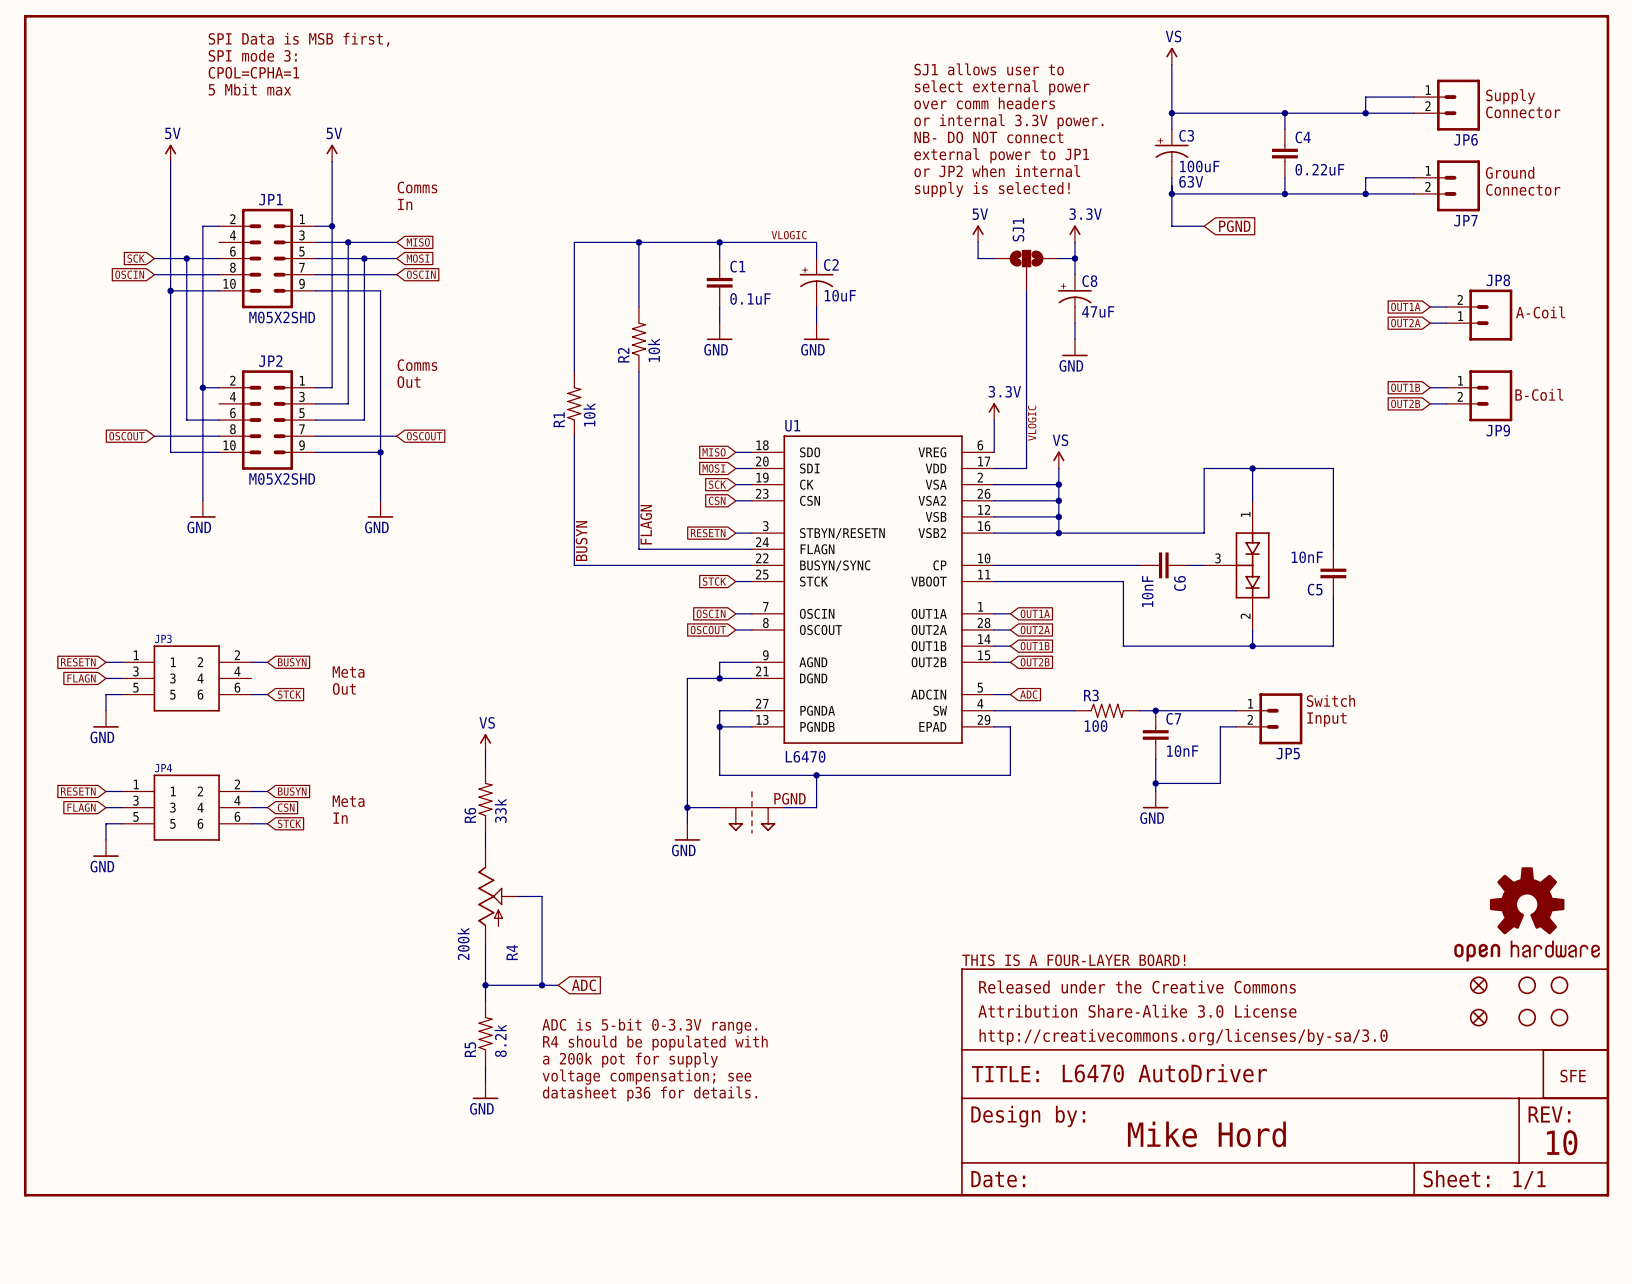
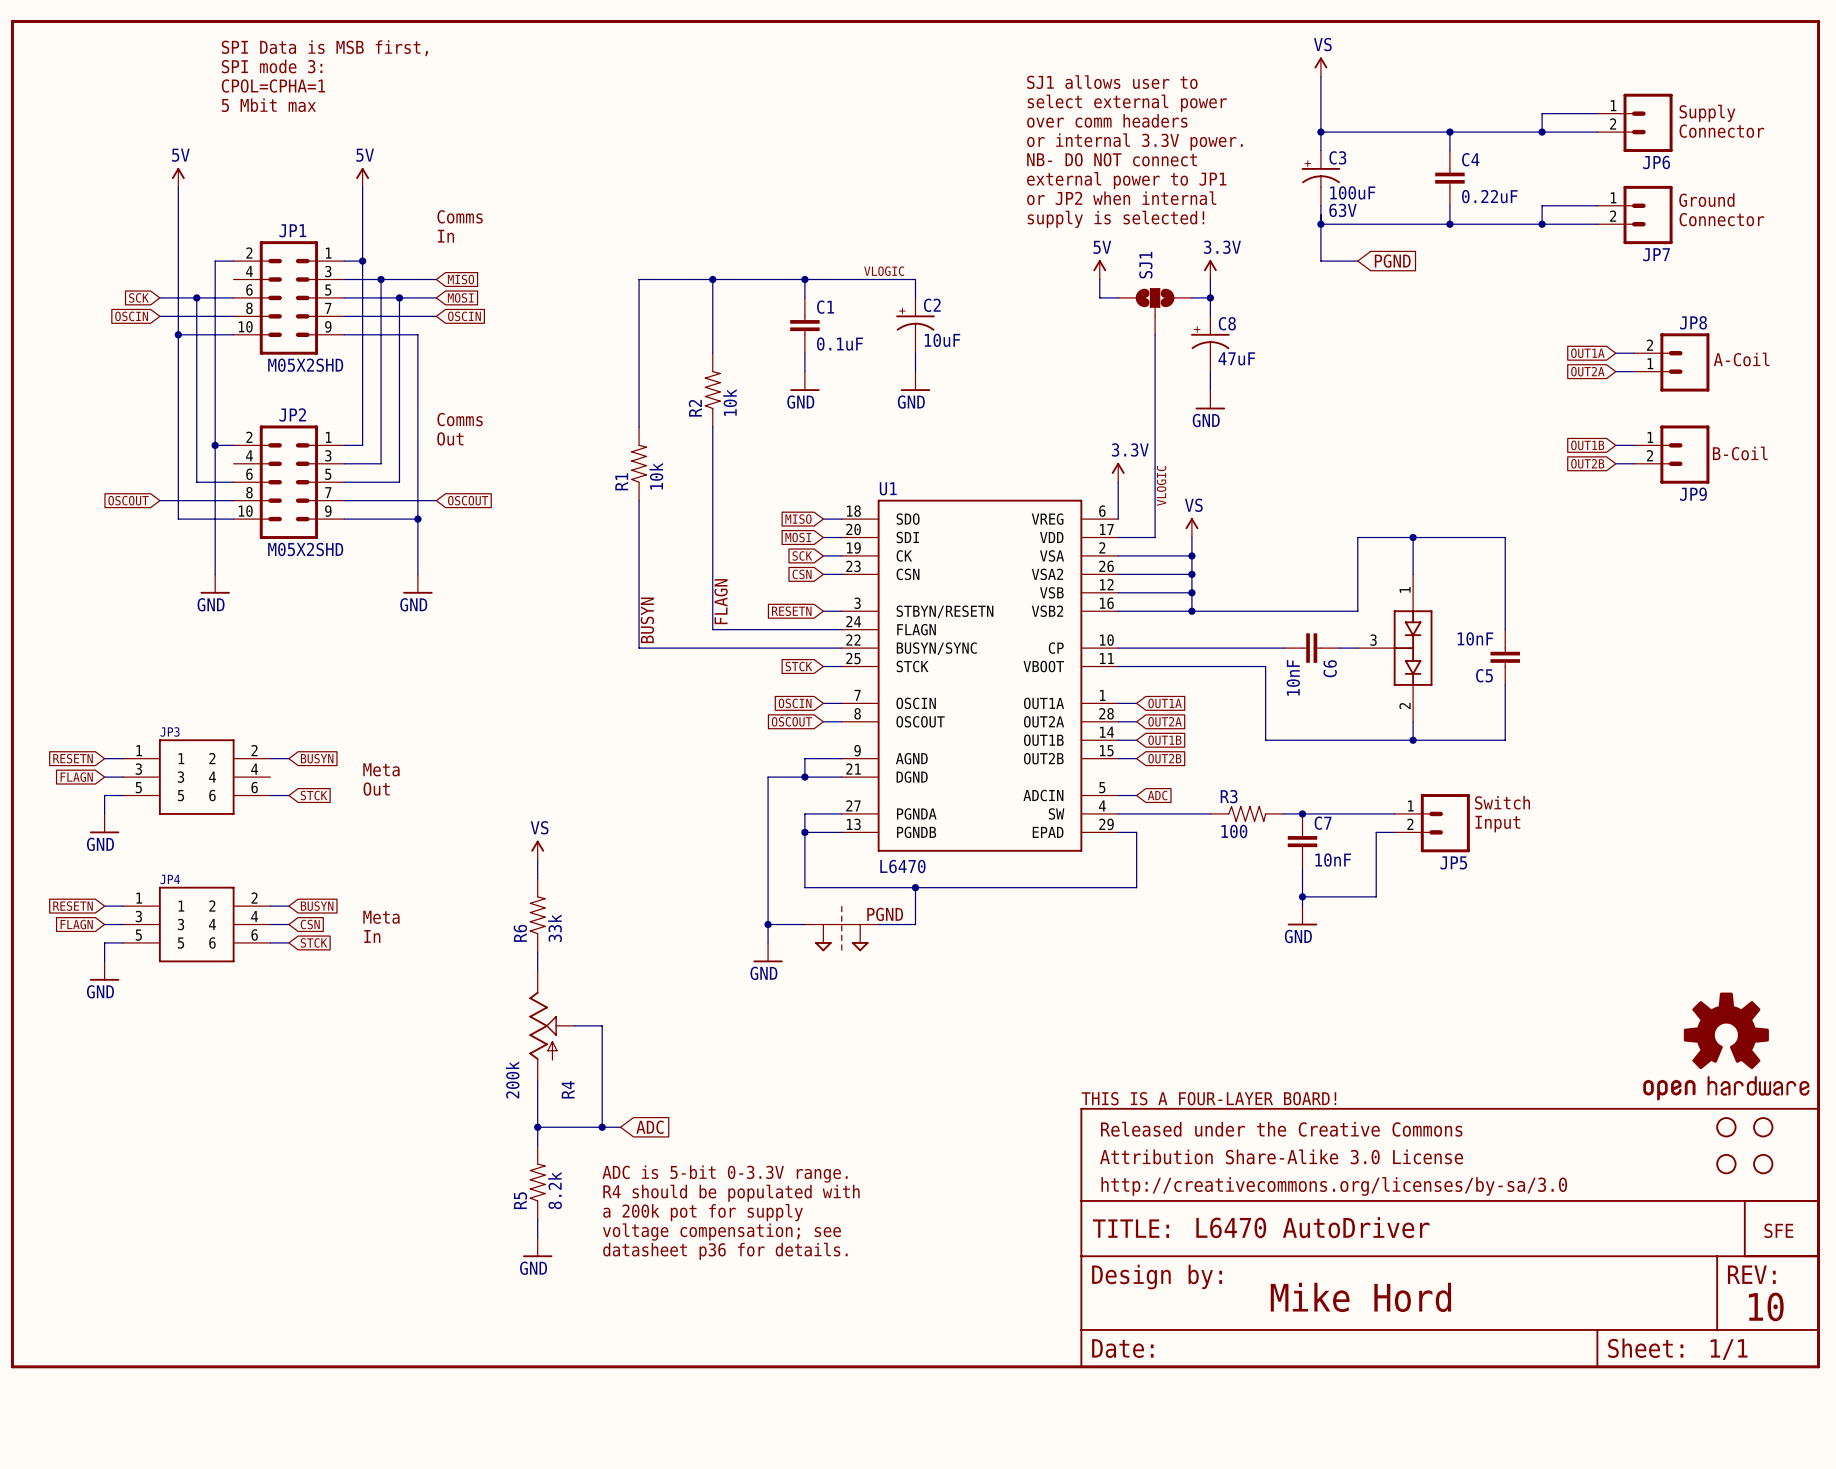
part: (1478, 985) -> none
part: (1478, 1017) -> none

